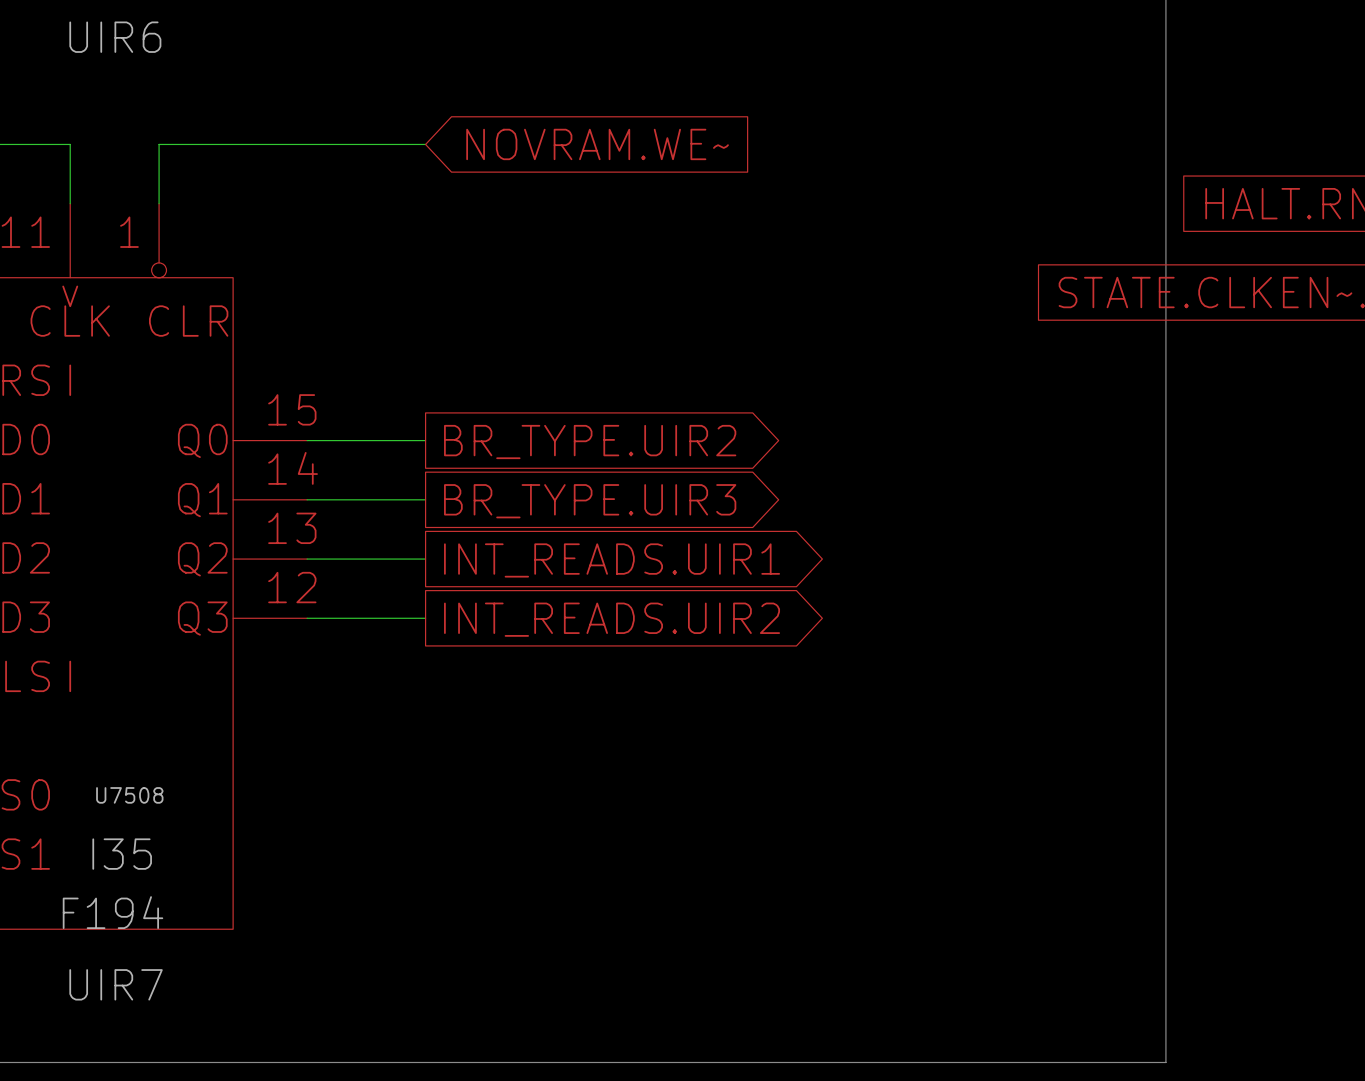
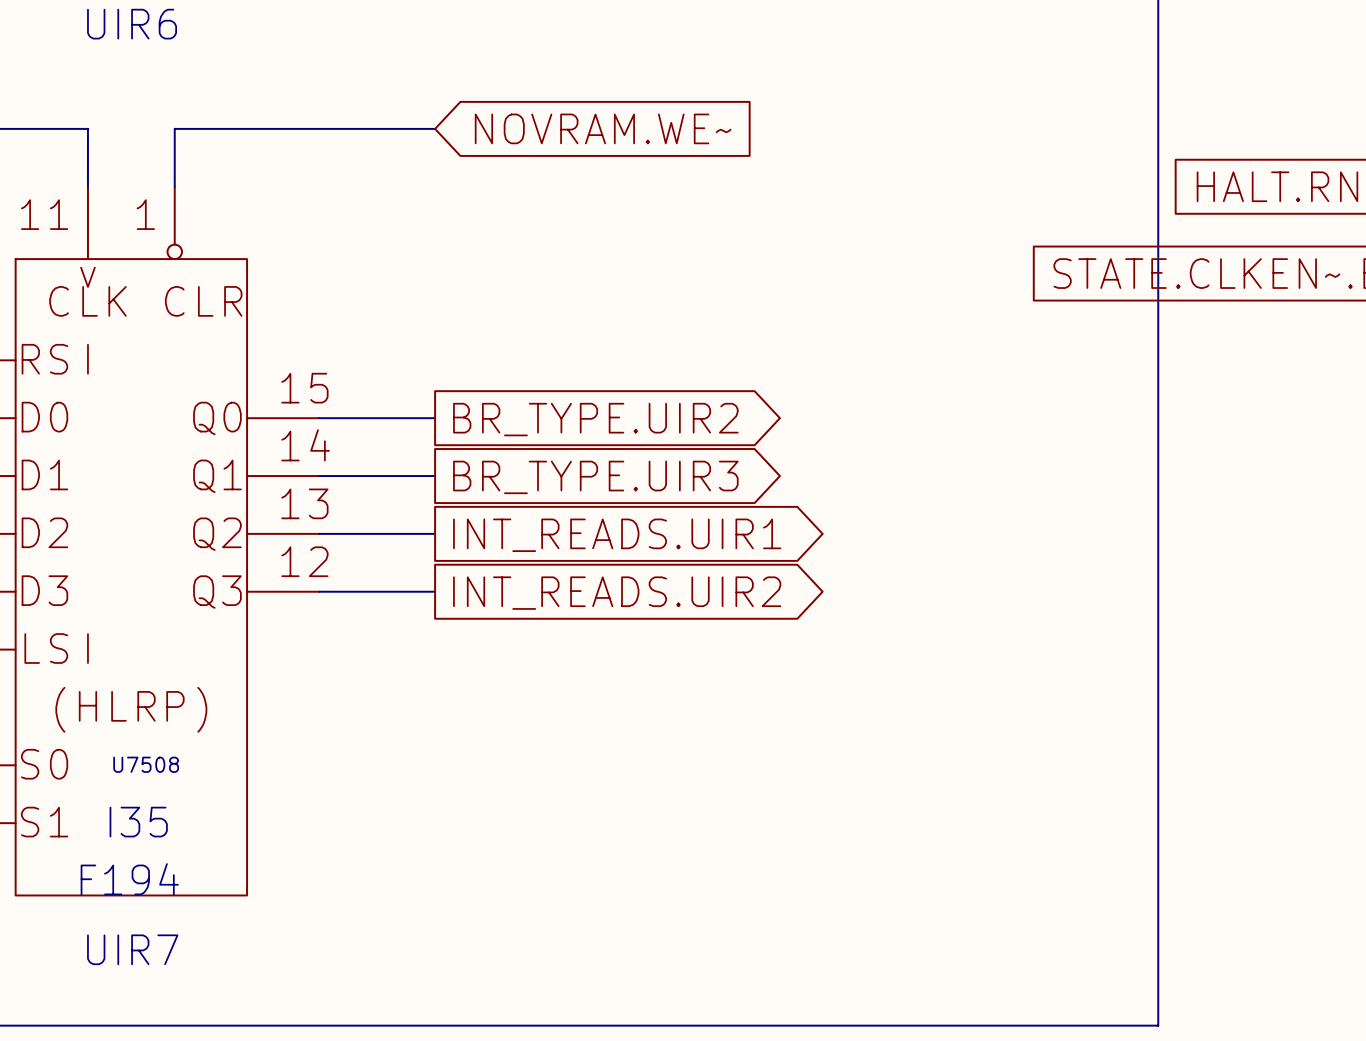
U7508 text: none -> H (87, 706)
U7508 text: none -> L (118, 706)
U7508 text: none -> R (146, 706)
U7508 text: none -> P (175, 706)
U7508 text: none -> ( (60, 709)
U7508 text: none -> ) (202, 709)

